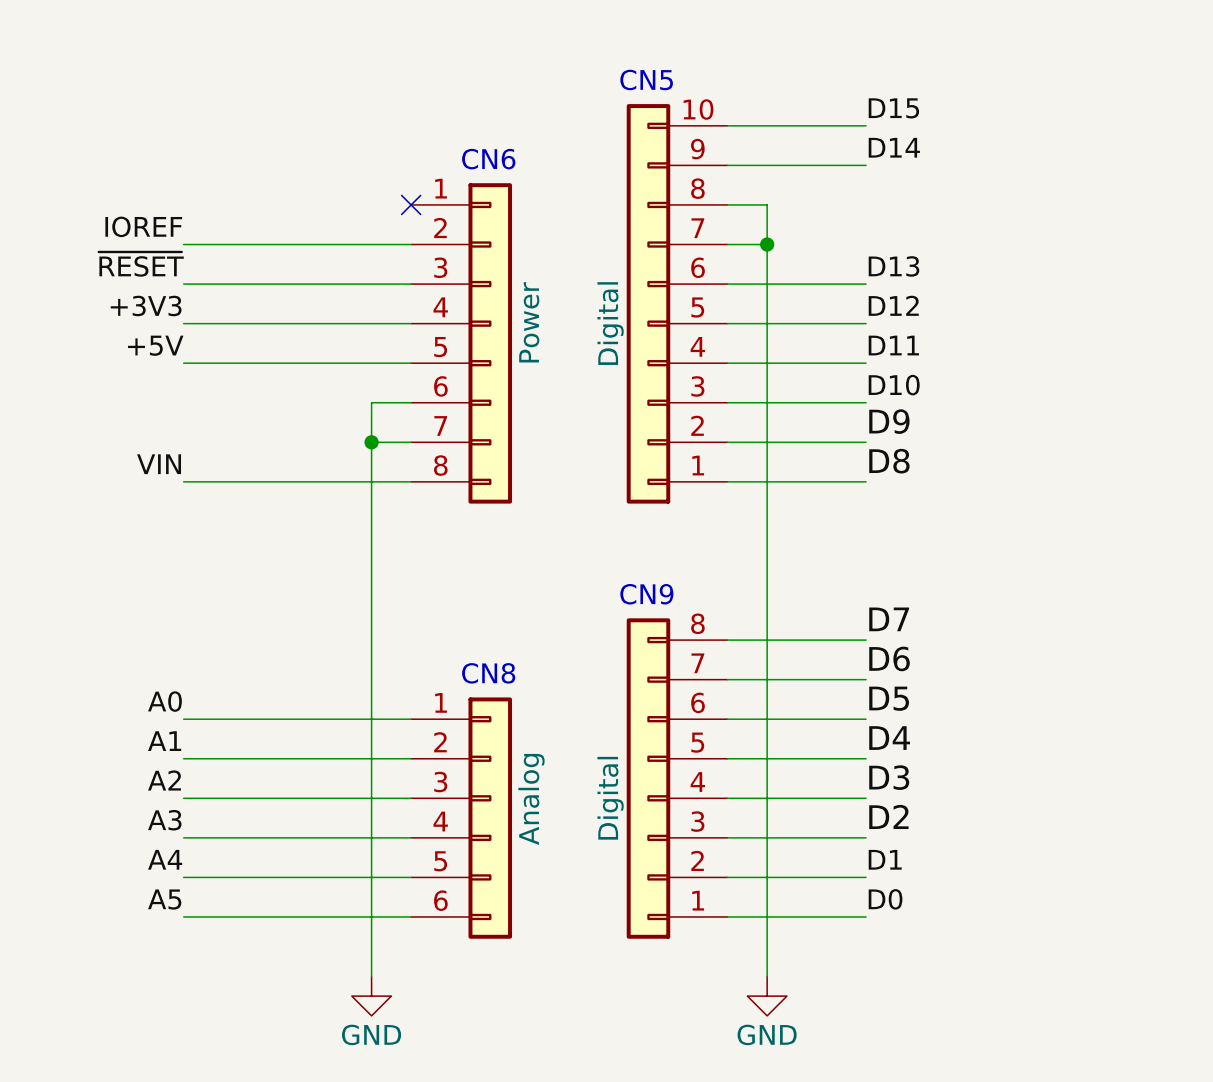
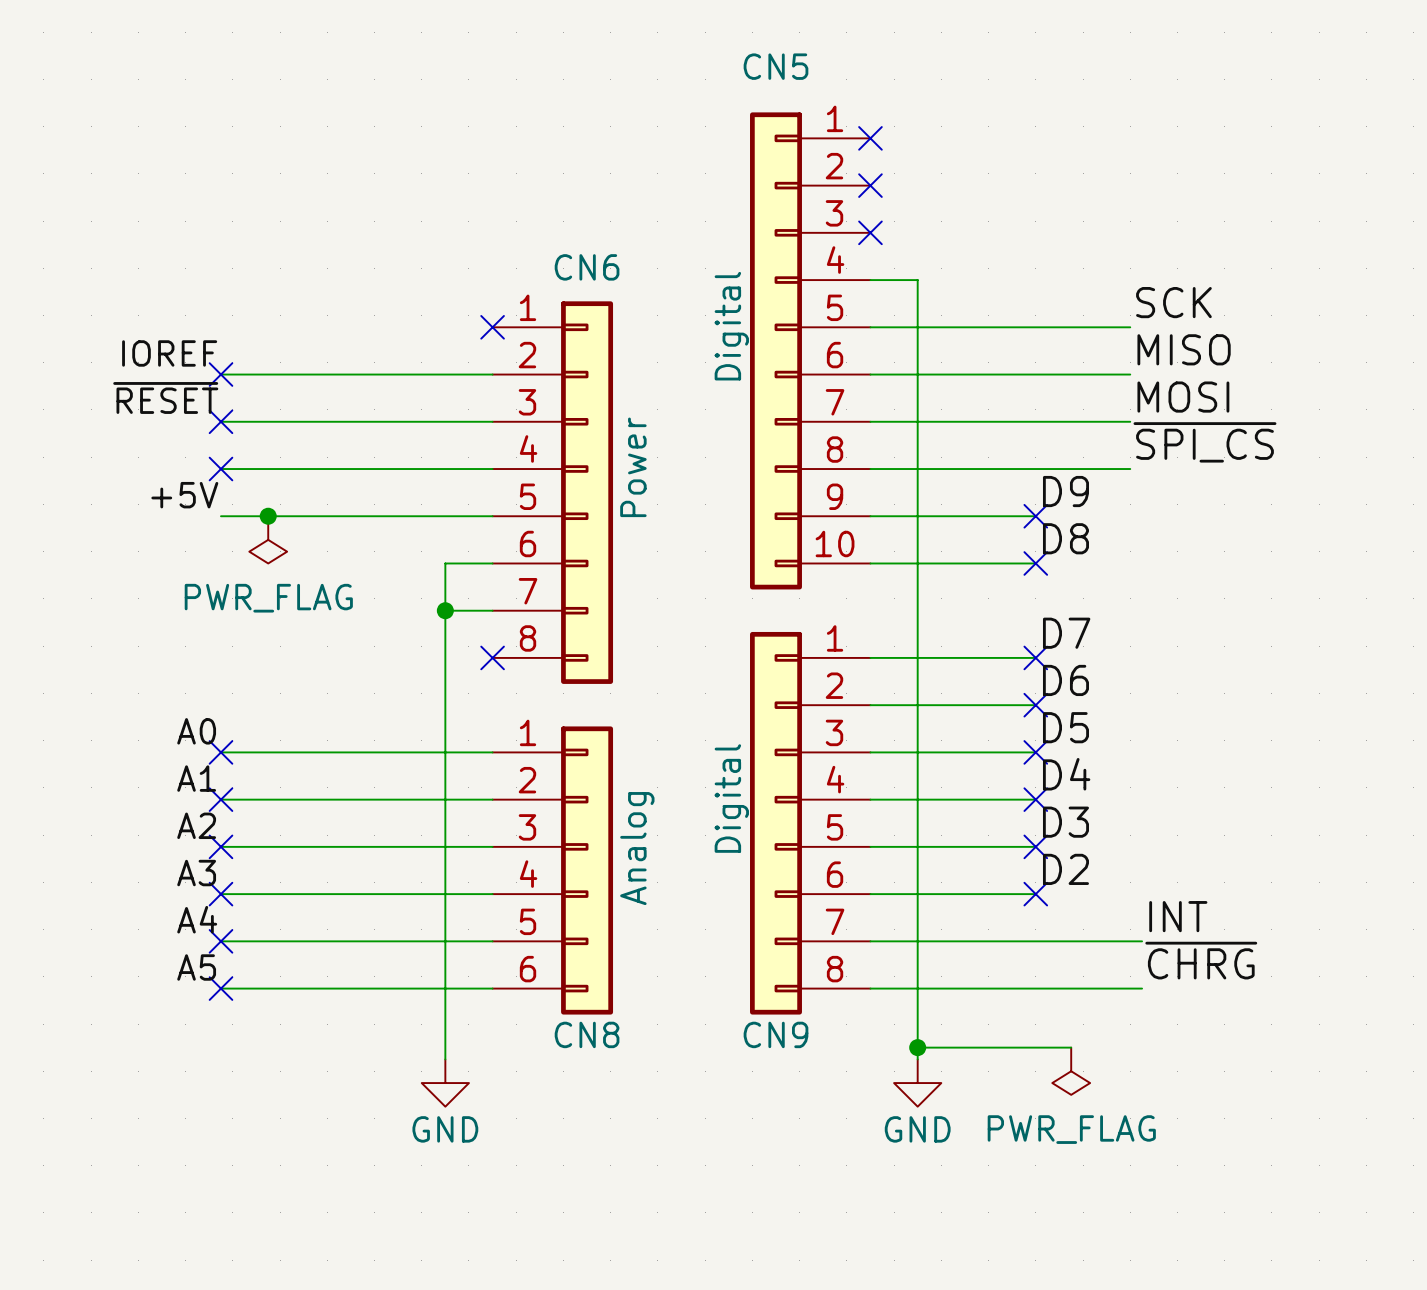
CN5 name: none -> CN5 (775, 66)
text: CN5 (646, 79) -> none
label: D15 (893, 108) -> none
wire: (727, 125) (866, 125) -> none
no-connect mark: none -> (870, 138)
label: D14 (894, 147) -> none
text: CN6 (488, 159) -> none
wire: (727, 165) (866, 165) -> none
no-connect mark: none -> (870, 185)
no-connect mark position: (411, 204) -> (492, 327)
wire: (727, 204) (767, 204) (767, 244) -> none
no-connect mark: none -> (870, 232)
label: IOREF (143, 226) -> none
wire: (183, 244) (411, 244) -> none
junction: (767, 244) -> none
label: none -> SCK (1173, 302)
label: ~{RESET} (141, 264) -> none
label: D13 (893, 266) -> none
wire: (183, 284) (411, 284) -> none
wire: none -> (1035, 327) (1130, 327)
label: none -> MISO (1184, 349)
CN5 flip: as is (648, 303) -> up-down (775, 350)
label: +3V3 (146, 305) -> IOREF (169, 353)
label: D12 (893, 305) -> none
no-connect mark: none -> (220, 374)
wire: none -> (1035, 374) (1130, 374)
label: none -> MOSI (1183, 397)
part: Power (461, 343) -> none
label: +5V (155, 345) -> ~{RESET} (165, 397)
label: D11 (893, 345) -> none
no-connect mark: none -> (220, 421)
wire: none -> (1035, 421) (1130, 421)
label: none -> ~{SPI_CS} (1204, 442)
label: D10 (894, 385) -> none
no-connect mark: none -> (220, 469)
wire: (371, 402) (371, 481) (183, 481) -> (445, 469) (220, 469)
wire: none -> (1035, 469) (1130, 469)
CN6: none -> Power (552, 492)
label: none -> +5V (184, 495)
wire: none -> (220, 516) (445, 516)
junction: none -> (268, 516)
junction: (371, 442) -> none
no-connect mark: none -> (1035, 516)
power symbol: none -> PWR_FLAG (268, 539)
label: VIN (159, 464) -> none
no-connect mark: none -> (1035, 563)
wire: none -> (445, 610) (492, 610)
junction: none -> (445, 610)
label: none -> D7 (1066, 633)
no-connect mark: none -> (492, 657)
no-connect mark: none -> (1035, 657)
label: none -> D6 (1065, 680)
text: CN9 (646, 594) -> none
no-connect mark: none -> (1035, 705)
label: D7 (889, 619) -> D5 (1065, 727)
label: none -> A0 (196, 731)
no-connect mark: none -> (220, 752)
no-connect mark: none -> (1035, 752)
label: D6 (889, 658) -> D4 (1066, 774)
label: none -> A1 (196, 778)
text: CN8 (488, 673) -> none
no-connect mark: none -> (220, 799)
no-connect mark: none -> (1035, 799)
label: D5 (889, 698) -> D3 (1065, 822)
CN9: none -> Digital (810, 823)
label: A0 (164, 701) -> A2 (196, 825)
no-connect mark: none -> (220, 846)
no-connect mark: none -> (1035, 846)
CN8: none -> Analog (552, 870)
label: D4 (889, 738) -> D2 (1065, 869)
label: A1 (164, 741) -> A3 (196, 873)
no-connect mark: none -> (220, 894)
no-connect mark: none -> (1035, 894)
label: D3 (889, 777) -> none
label: none -> INT (1178, 916)
part: Digital (677, 778) -> none
label: A2 (164, 780) -> A4 (197, 919)
no-connect mark: none -> (220, 941)
wire: none -> (1035, 941) (1142, 941)
label: none -> ~{CHRG} (1201, 960)
label: D2 (888, 816) -> none
part: Analog (461, 818) -> none
label: A3 (164, 820) -> A5 (196, 967)
no-connect mark: none -> (220, 988)
wire: none -> (1035, 988) (1142, 988)
label: A4 (165, 859) -> none
label: D1 (885, 859) -> none
wire: (183, 877) (411, 877) -> (220, 752) (492, 752)
wire: (727, 877) (866, 877) -> (870, 705) (1035, 705)
wire: none -> (917, 1047) (1071, 1047)
junction: none -> (917, 1047)
wire: (371, 897) (371, 976) -> none
wire: (767, 897) (767, 976) -> none
label: A5 (164, 899) -> none
label: D0 (885, 899) -> none
power symbol: none -> PWR_FLAG (1071, 1071)
wire: (183, 916) (411, 916) -> (220, 799) (492, 799)
wire: (727, 916) (866, 916) -> (870, 657) (1035, 657)
power symbol position: GND (371, 996) -> GND (445, 1083)
power symbol position: GND (767, 996) -> GND (917, 1083)

